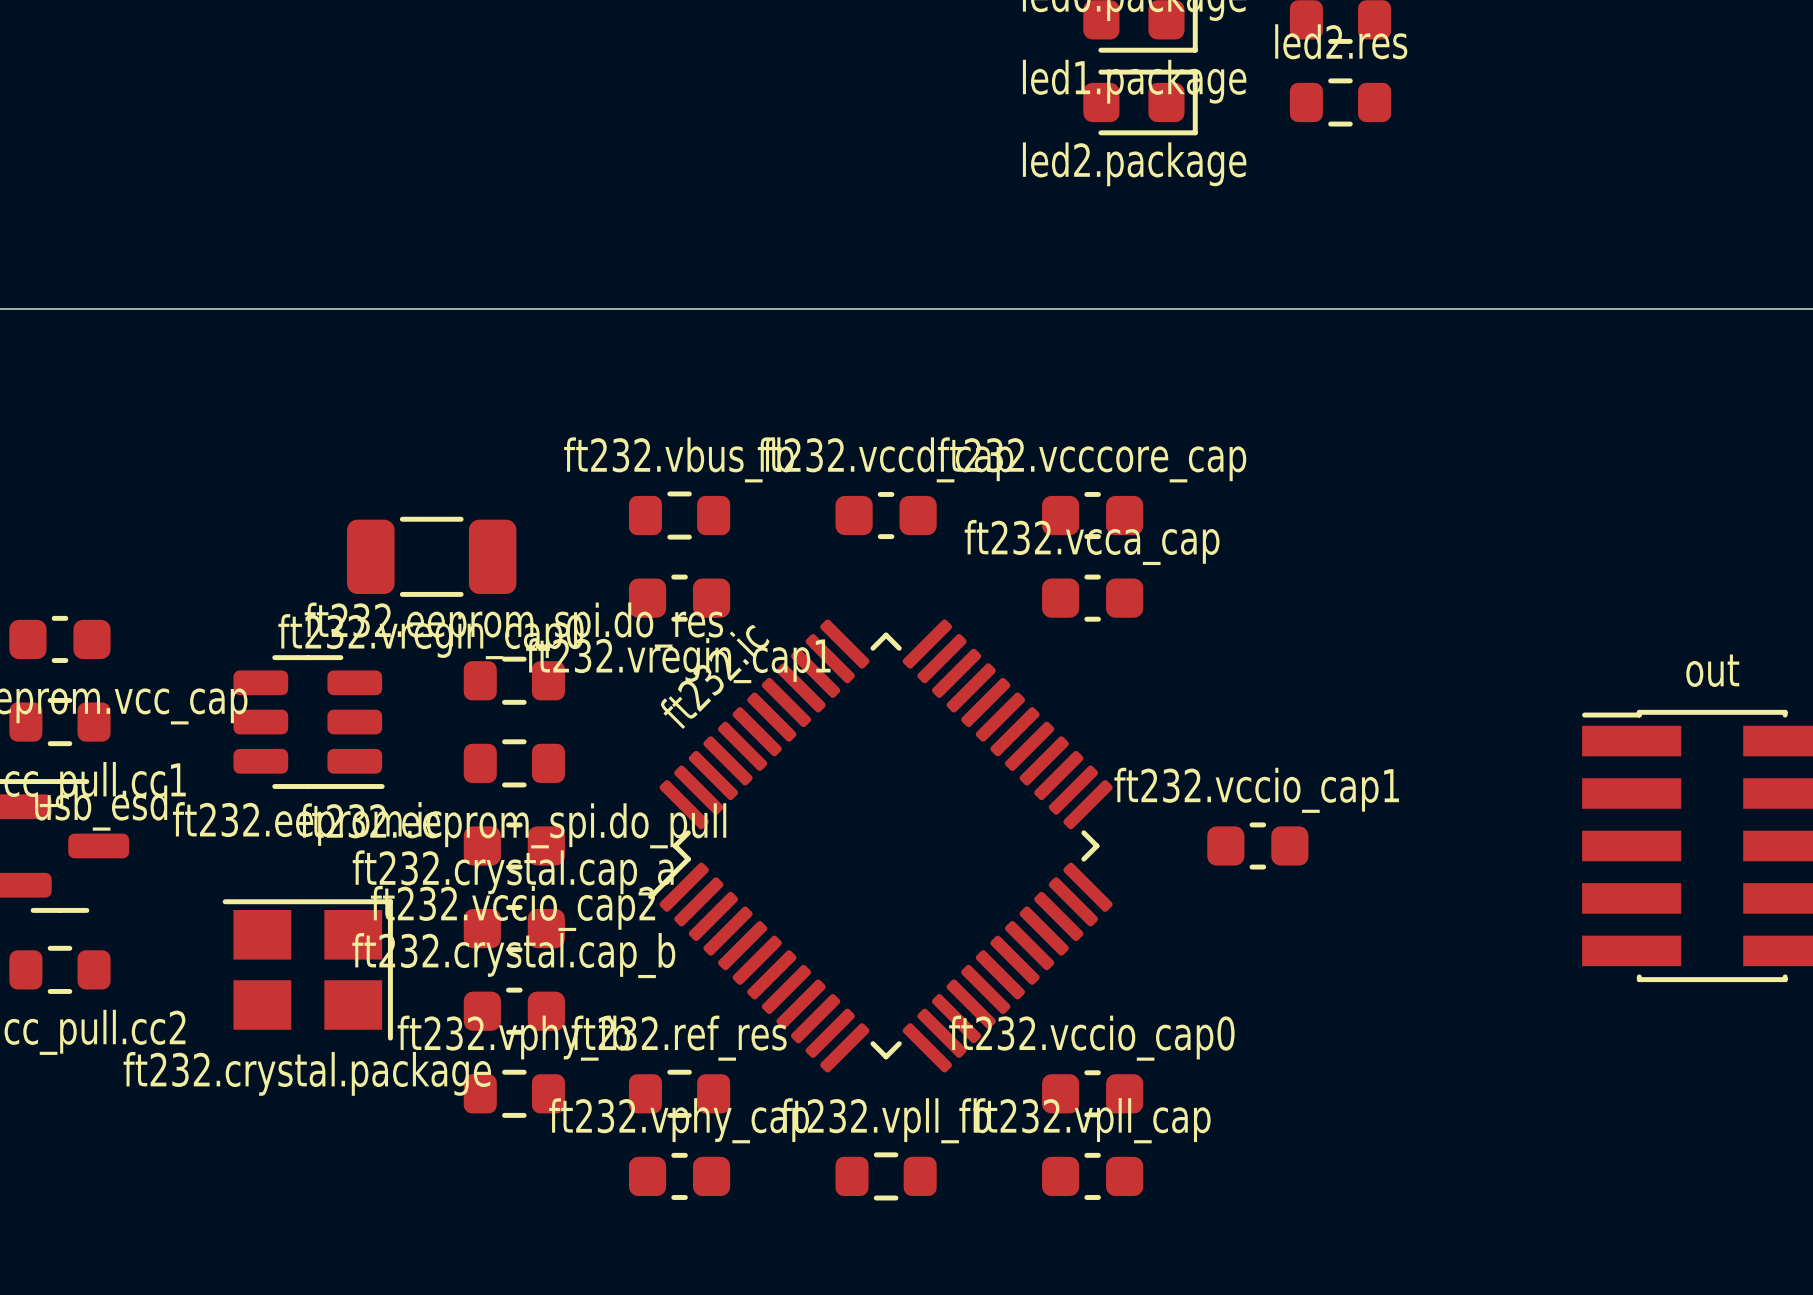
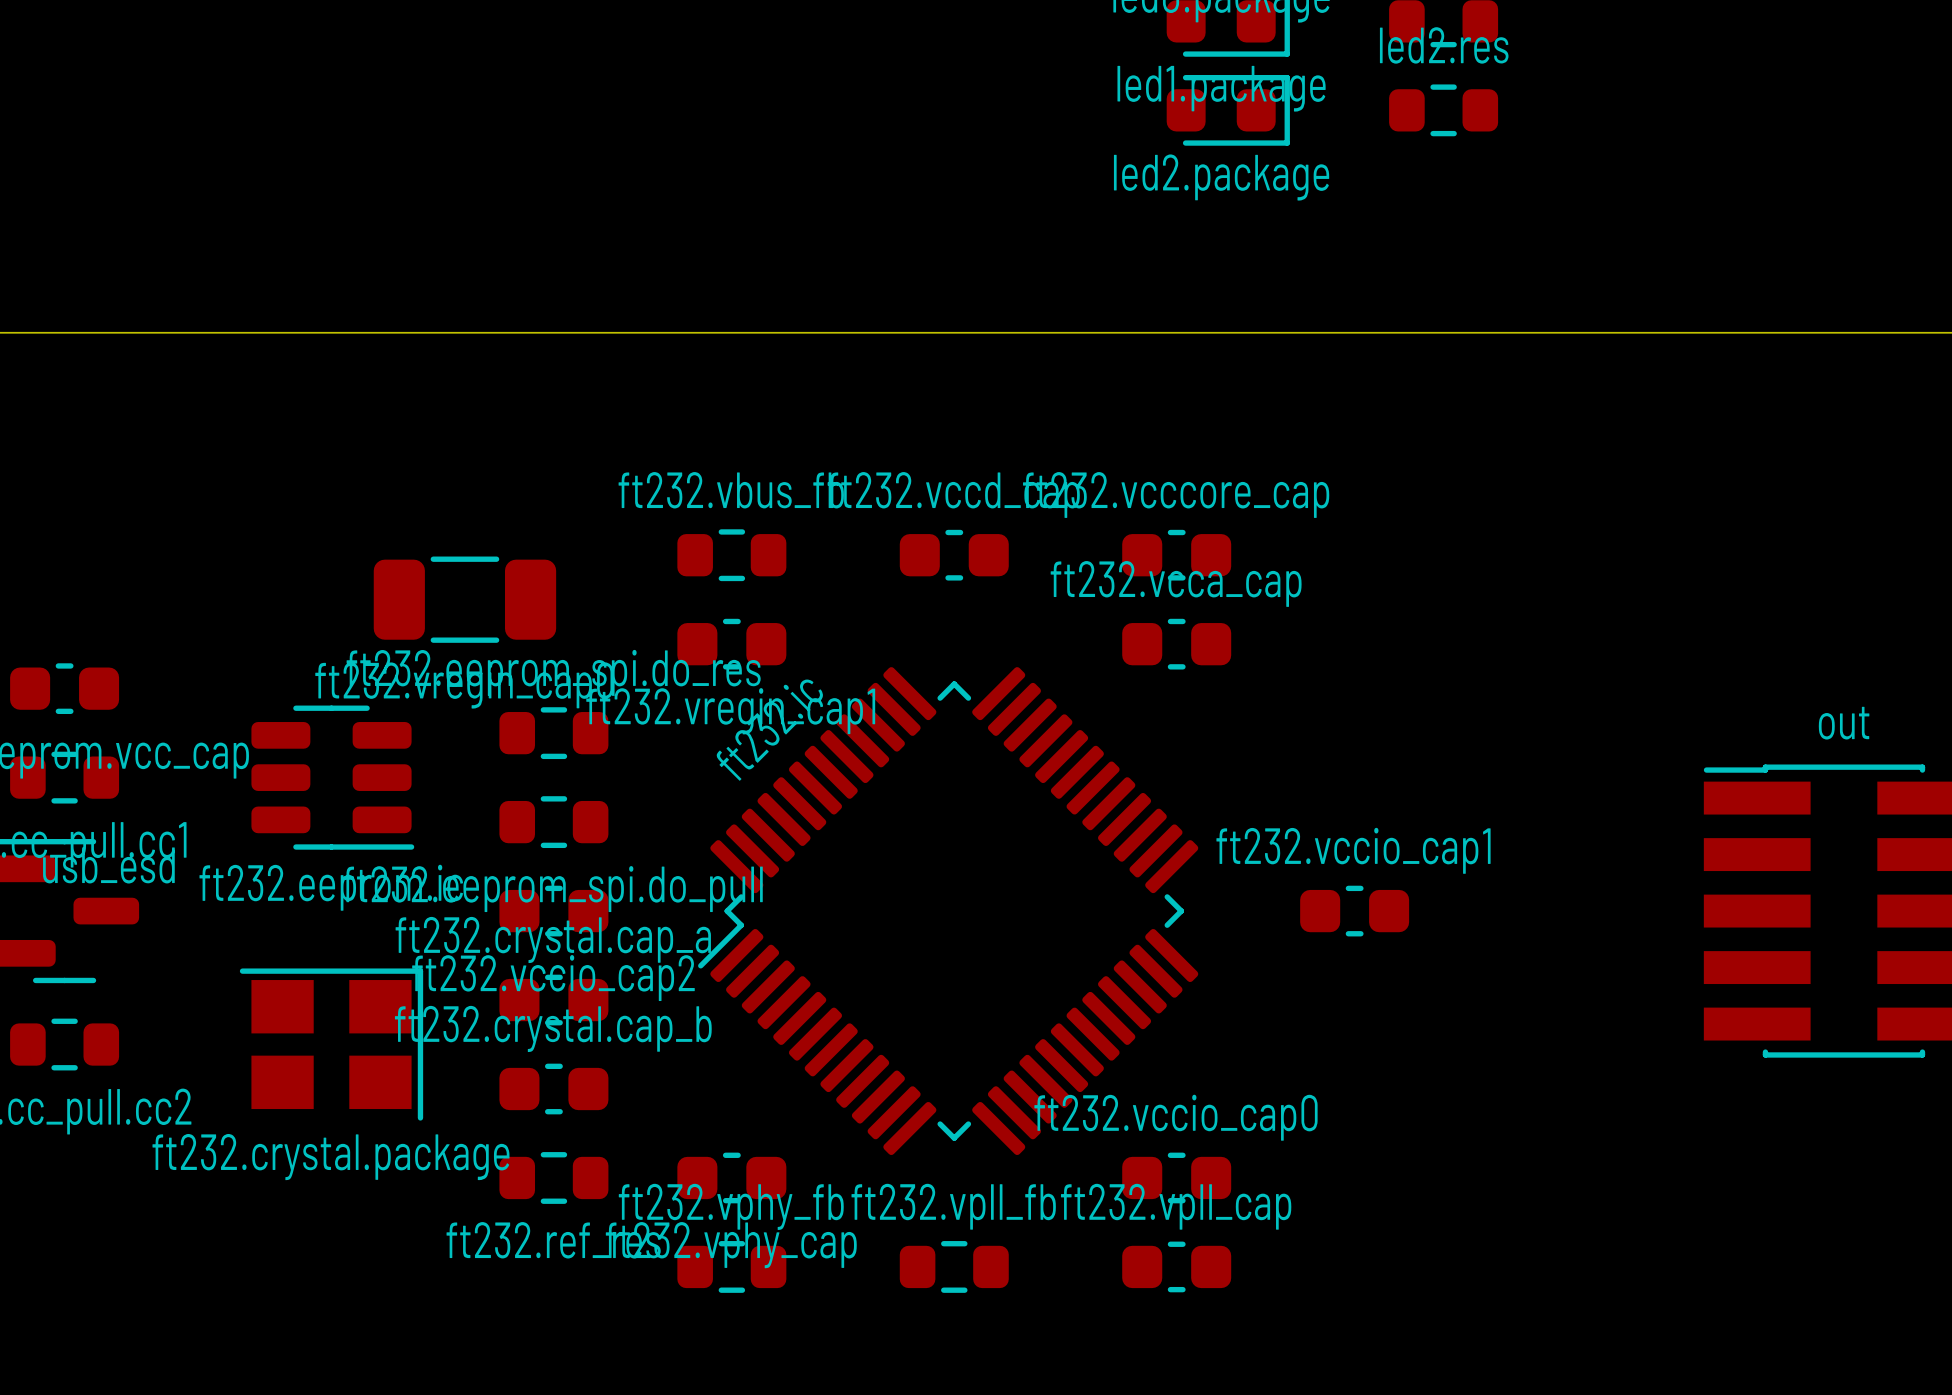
ft232.vphy_fb name: ft232.vphy_fb (513, 1038) -> ft232.ref_res (553, 1240)
ft232.ref_res: (679, 1093) -> none
ft232.vphy_cap name position: ft232.vphy_cap (679, 1120) -> ft232.vphy_cap (731, 1245)
ft232.vphy_cap position: (679, 1176) -> (731, 1177)
ft232.vphy_fb: none -> (731, 1266)

